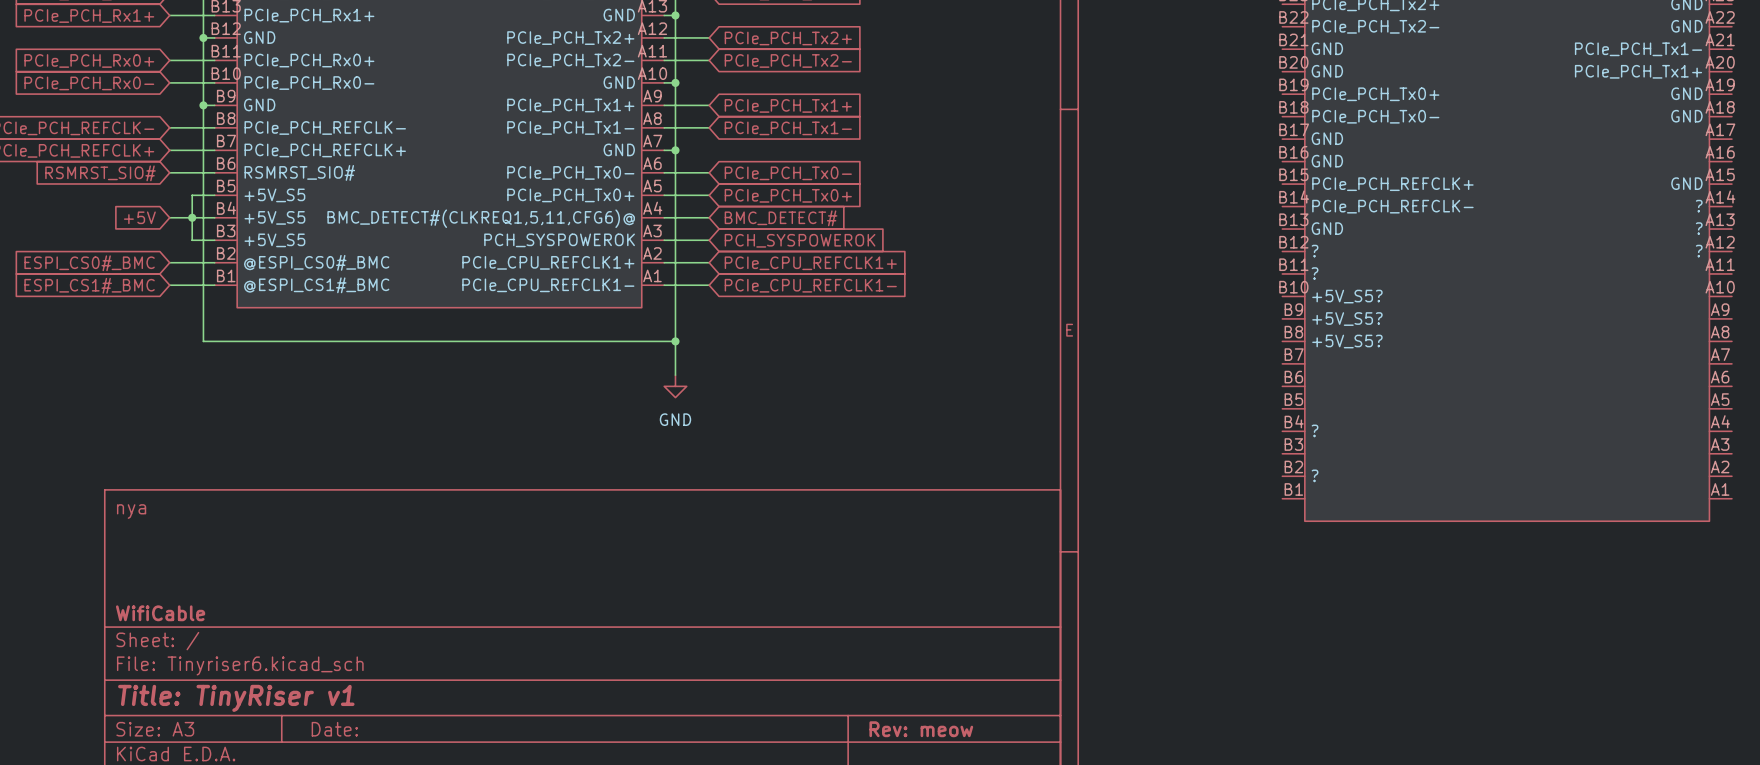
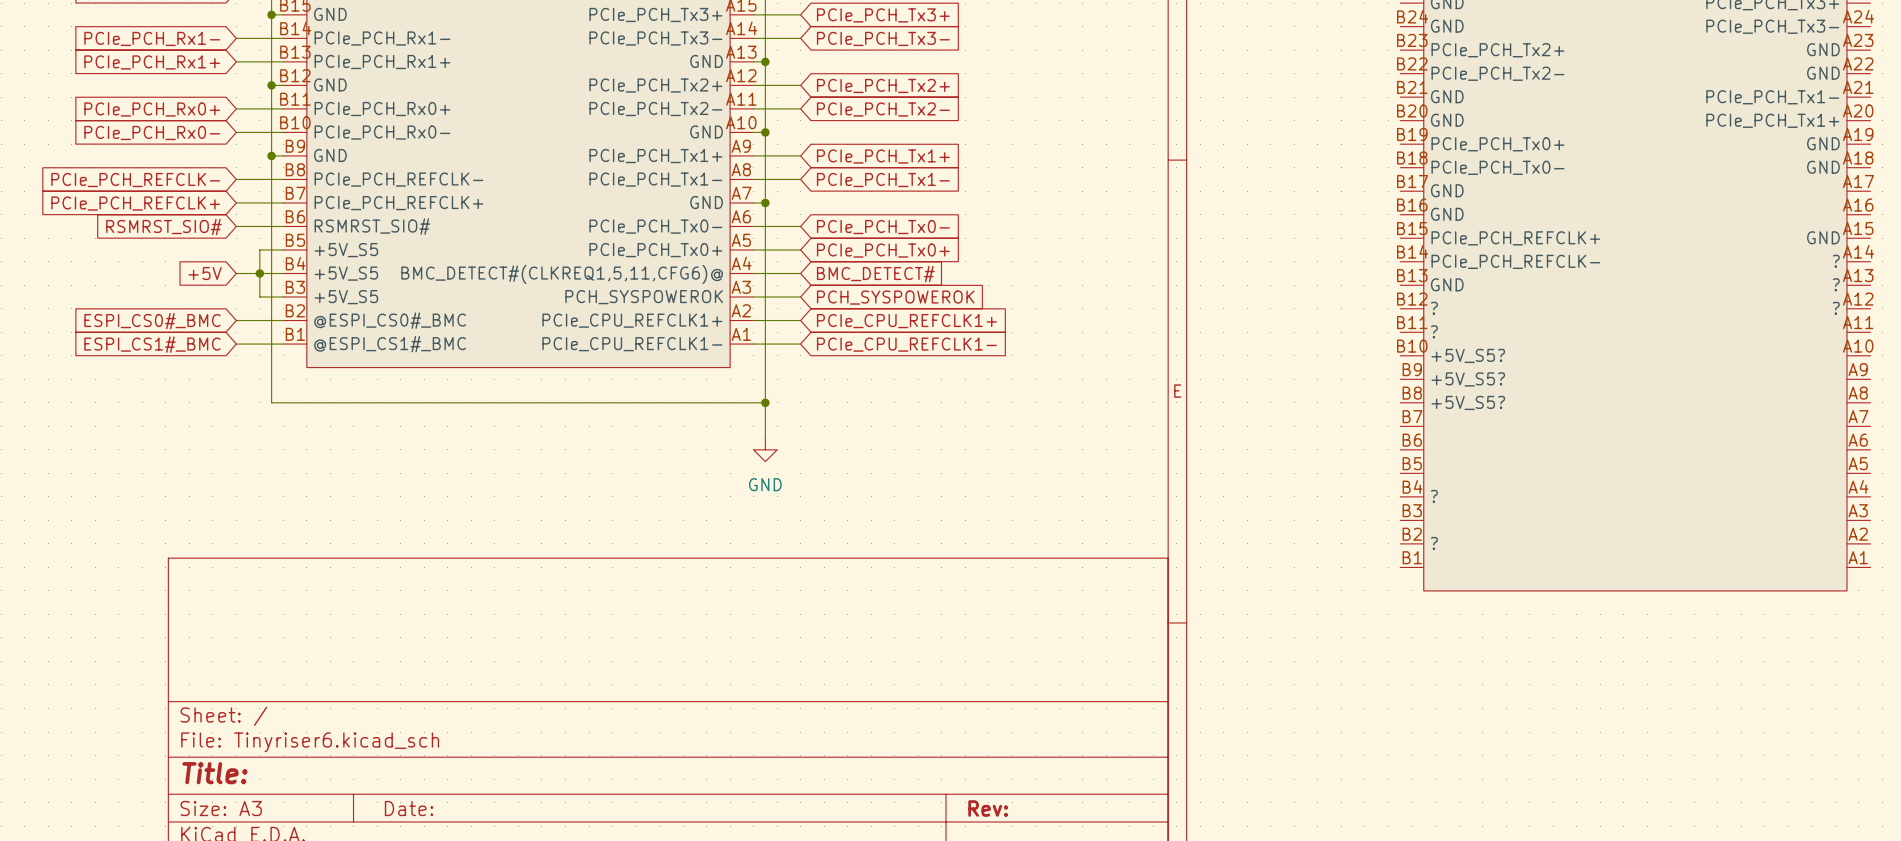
title block: nya (131, 511) -> none
title block: WifiCable (160, 613) -> none
title block: Title: TinyRiser v1 (236, 698) -> Title: (214, 773)
title block: Rev: meow (921, 729) -> Rev: (988, 808)

